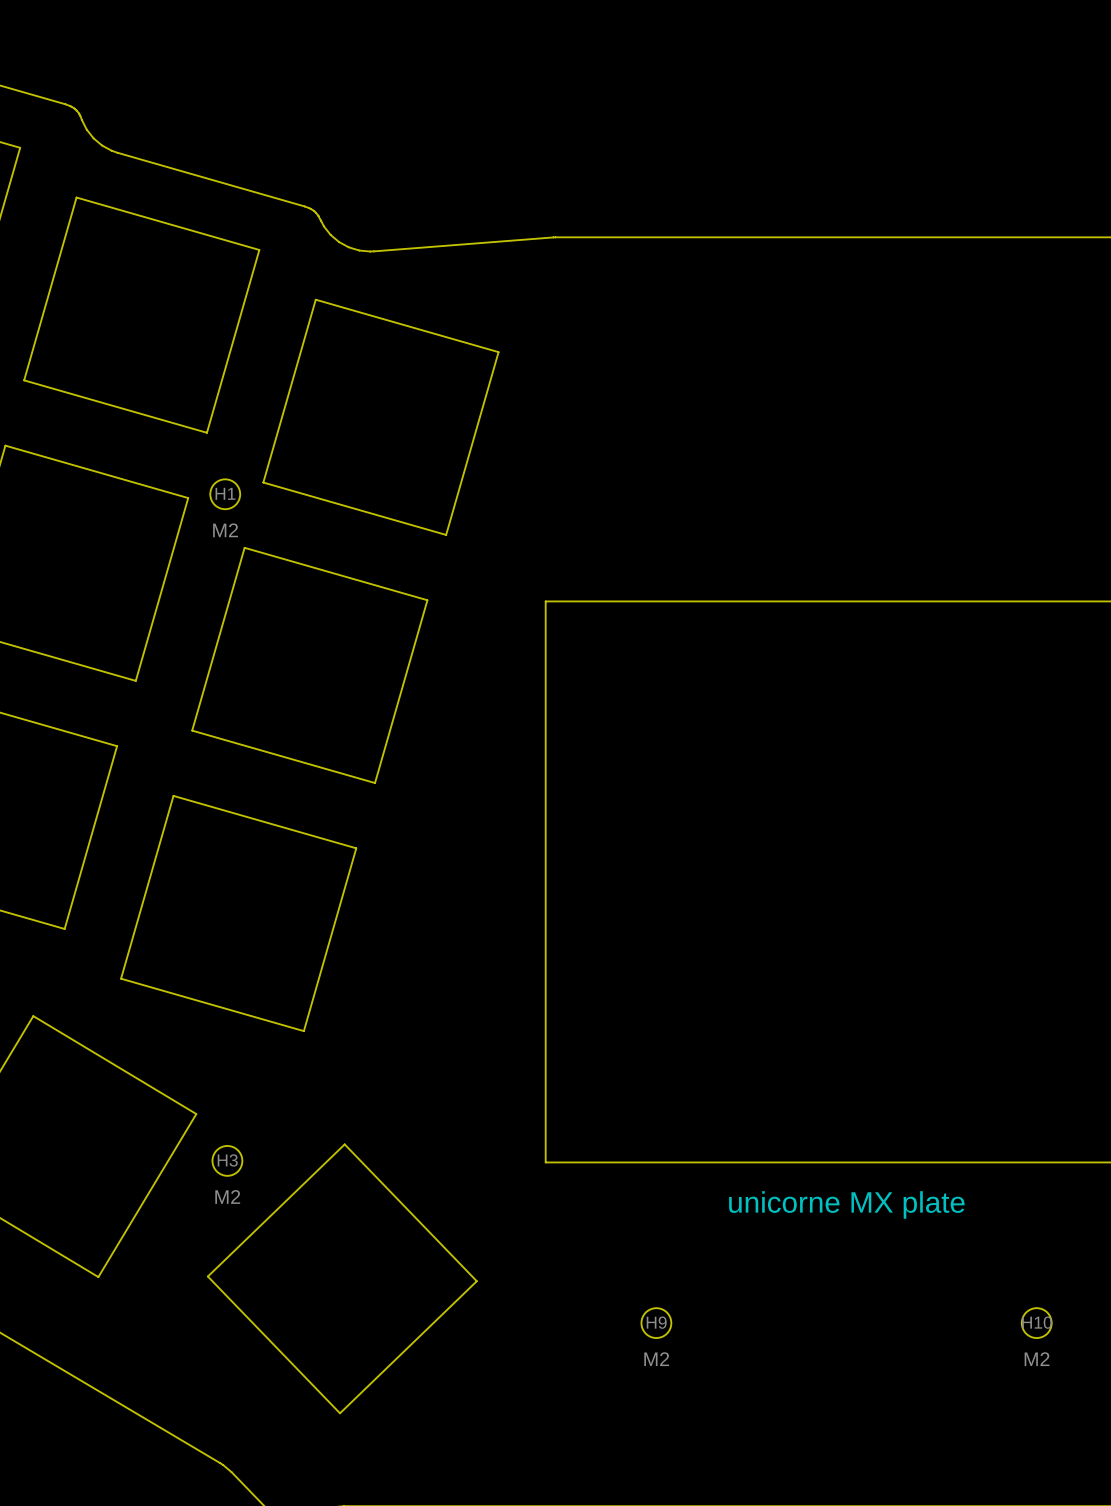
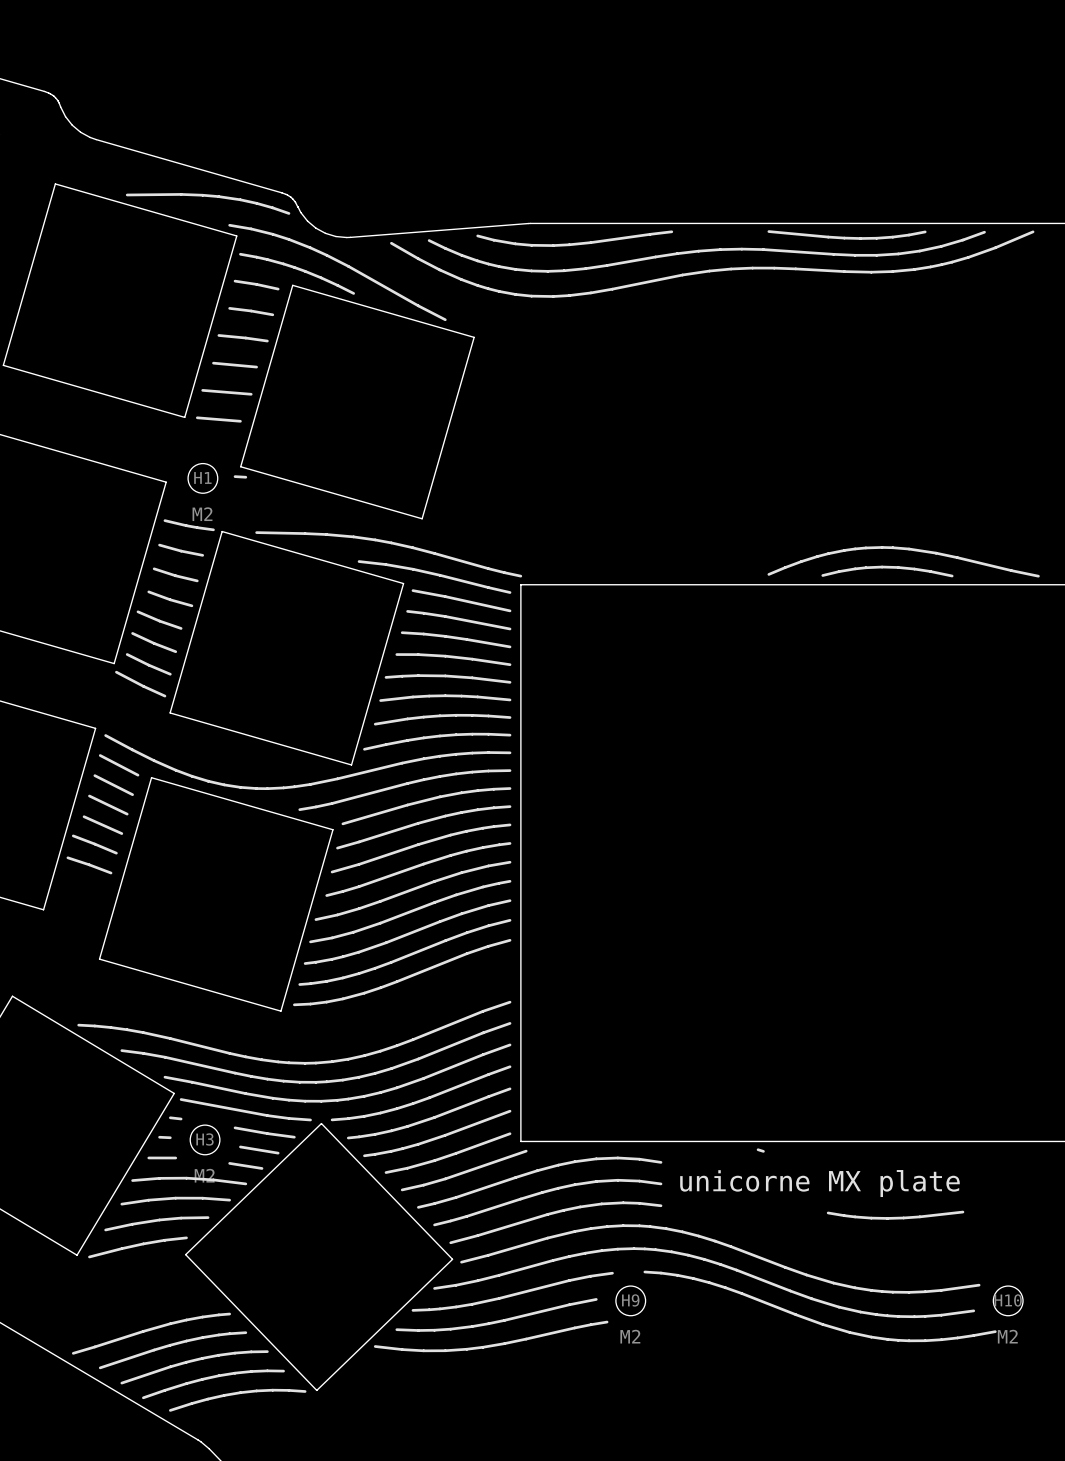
line: none -> (127, 194) (181, 194) (218, 196) (256, 203) (288, 213)
line: none -> (229, 225) (272, 234) (310, 247) (348, 266) (445, 319)
line: none -> (671, 231) (553, 245) (515, 243) (477, 235)
line: none -> (768, 231) (860, 238) (892, 237) (925, 231)
line: none -> (1033, 231) (968, 257) (914, 269) (871, 272) (774, 268) (731, 269) (682, 275) (590, 292) (553, 296) (515, 294) (477, 285) (439, 269) (391, 243)
line: none -> (984, 232) (941, 246) (898, 253) (855, 255) (763, 249) (720, 249) (677, 253) (585, 268) (547, 271) (515, 269) (488, 264) (461, 255) (429, 240)
line: none -> (240, 254) (294, 267) (353, 293)
line: none -> (235, 281) (278, 289)
line: none -> (229, 308) (272, 314)
line: none -> (218, 335) (267, 341)
line: none -> (213, 363) (256, 367)
line: none -> (202, 390) (251, 394)
line: none -> (197, 417) (240, 421)
line: none -> (235, 476) (245, 477)
line: none -> (164, 520) (213, 529)
line: none -> (256, 532) (326, 534) (375, 539) (520, 576)
line: none -> (159, 545) (202, 555)
line: none -> (359, 561) (412, 569) (510, 592)
line: none -> (154, 568) (197, 580)
line: none -> (768, 574) (828, 553) (855, 548) (882, 547) (936, 553) (1038, 576)
line: none -> (822, 575) (855, 568) (882, 567) (914, 569) (952, 576)
line: none -> (412, 590) (510, 610)
line: none -> (148, 591) (191, 605)
line: none -> (137, 611) (181, 628)
line: none -> (407, 611) (510, 628)
line: none -> (402, 632) (445, 636) (510, 646)
line: none -> (132, 633) (175, 651)
line: none -> (127, 654) (170, 674)
line: none -> (396, 654) (445, 656) (510, 664)
line: none -> (116, 672) (164, 696)
line: none -> (386, 677) (445, 675) (510, 682)
line: none -> (510, 699) (445, 695) (380, 700)
line: none -> (510, 717) (439, 715) (375, 724)
line: none -> (510, 735) (439, 735) (364, 749)
line: none -> (105, 735) (154, 760) (191, 776) (224, 784) (256, 788) (310, 784) (439, 756) (472, 753) (510, 752)
line: none -> (100, 755) (137, 775)
line: none -> (510, 770) (472, 772) (439, 776) (299, 809)
line: none -> (94, 775) (132, 794)
line: none -> (510, 788) (477, 790) (439, 796) (342, 823)
line: none -> (89, 796) (127, 814)
line: none -> (510, 806) (477, 809) (445, 816) (337, 848)
line: none -> (84, 816) (121, 833)
line: none -> (510, 824) (450, 835) (332, 872)
line: none -> (73, 835) (116, 853)
line: none -> (510, 843) (450, 855) (326, 895)
line: none -> (67, 857) (111, 873)
line: none -> (510, 862) (461, 872) (359, 908) (315, 919)
line: none -> (510, 881) (456, 894) (353, 932) (310, 941)
line: none -> (510, 900) (461, 913) (359, 952) (305, 963)
line: none -> (510, 920) (466, 932) (359, 973) (326, 981) (299, 984)
line: none -> (510, 940) (466, 953) (364, 993) (326, 1002) (294, 1004)
line: none -> (510, 1002) (380, 1051) (348, 1059) (315, 1063) (262, 1059) (143, 1032) (78, 1025)
line: none -> (510, 1023) (391, 1068) (359, 1077) (326, 1081) (299, 1082) (267, 1079) (164, 1057) (121, 1050)
line: none -> (510, 1044) (396, 1087) (364, 1096) (337, 1100) (305, 1101) (272, 1098) (164, 1077)
line: none -> (510, 1066) (396, 1108) (364, 1116) (332, 1119)
line: none -> (510, 1088) (407, 1126) (375, 1134) (348, 1138)
line: none -> (181, 1099) (267, 1115) (310, 1119)
line: none -> (510, 1111) (418, 1144) (364, 1155)
line: none -> (170, 1117) (181, 1119)
line: none -> (235, 1127) (294, 1137)
line: none -> (510, 1133) (434, 1160) (386, 1172)
line: none -> (159, 1137) (170, 1137)
line: none -> (240, 1146) (278, 1153)
line: none -> (758, 1149) (763, 1151)
line: none -> (526, 1151) (445, 1178) (402, 1189)
line: none -> (148, 1157) (175, 1158)
line: none -> (661, 1162) (617, 1157) (574, 1161) (536, 1170) (456, 1197) (418, 1207)
line: none -> (229, 1163) (262, 1168)
line: none -> (132, 1180) (186, 1178) (245, 1183)
line: none -> (661, 1183) (617, 1180) (574, 1184) (434, 1224)
line: none -> (229, 1200) (175, 1198) (121, 1204)
line: none -> (661, 1205) (623, 1202) (580, 1206) (450, 1242)
line: none -> (962, 1212) (887, 1218) (828, 1212)
line: none -> (208, 1217) (159, 1219) (105, 1229)
line: none -> (186, 1237) (143, 1243) (89, 1256)
line: none -> (461, 1262) (574, 1231) (607, 1226) (639, 1225) (666, 1228) (698, 1236) (806, 1274) (855, 1287) (909, 1292) (979, 1285)
line: none -> (644, 1272) (677, 1275) (709, 1282) (822, 1324) (871, 1337) (925, 1340) (995, 1331)
line: none -> (612, 1273) (569, 1280) (472, 1304) (412, 1310)
line: none -> (434, 1288) (477, 1280) (585, 1253) (617, 1249) (644, 1248) (671, 1251) (704, 1259) (811, 1298) (860, 1312) (914, 1316) (973, 1310)
line: none -> (596, 1299) (472, 1326) (434, 1330) (396, 1329)
line: none -> (229, 1314) (170, 1323) (73, 1353)
line: none -> (607, 1322) (504, 1343) (466, 1349) (423, 1350) (375, 1346)
line: none -> (245, 1332) (186, 1341) (100, 1367)
line: none -> (267, 1351) (235, 1353) (202, 1358) (121, 1383)
line: none -> (283, 1371) (251, 1371) (218, 1375) (186, 1383) (143, 1397)
line: none -> (305, 1391) (272, 1390) (240, 1392) (208, 1399) (170, 1410)

